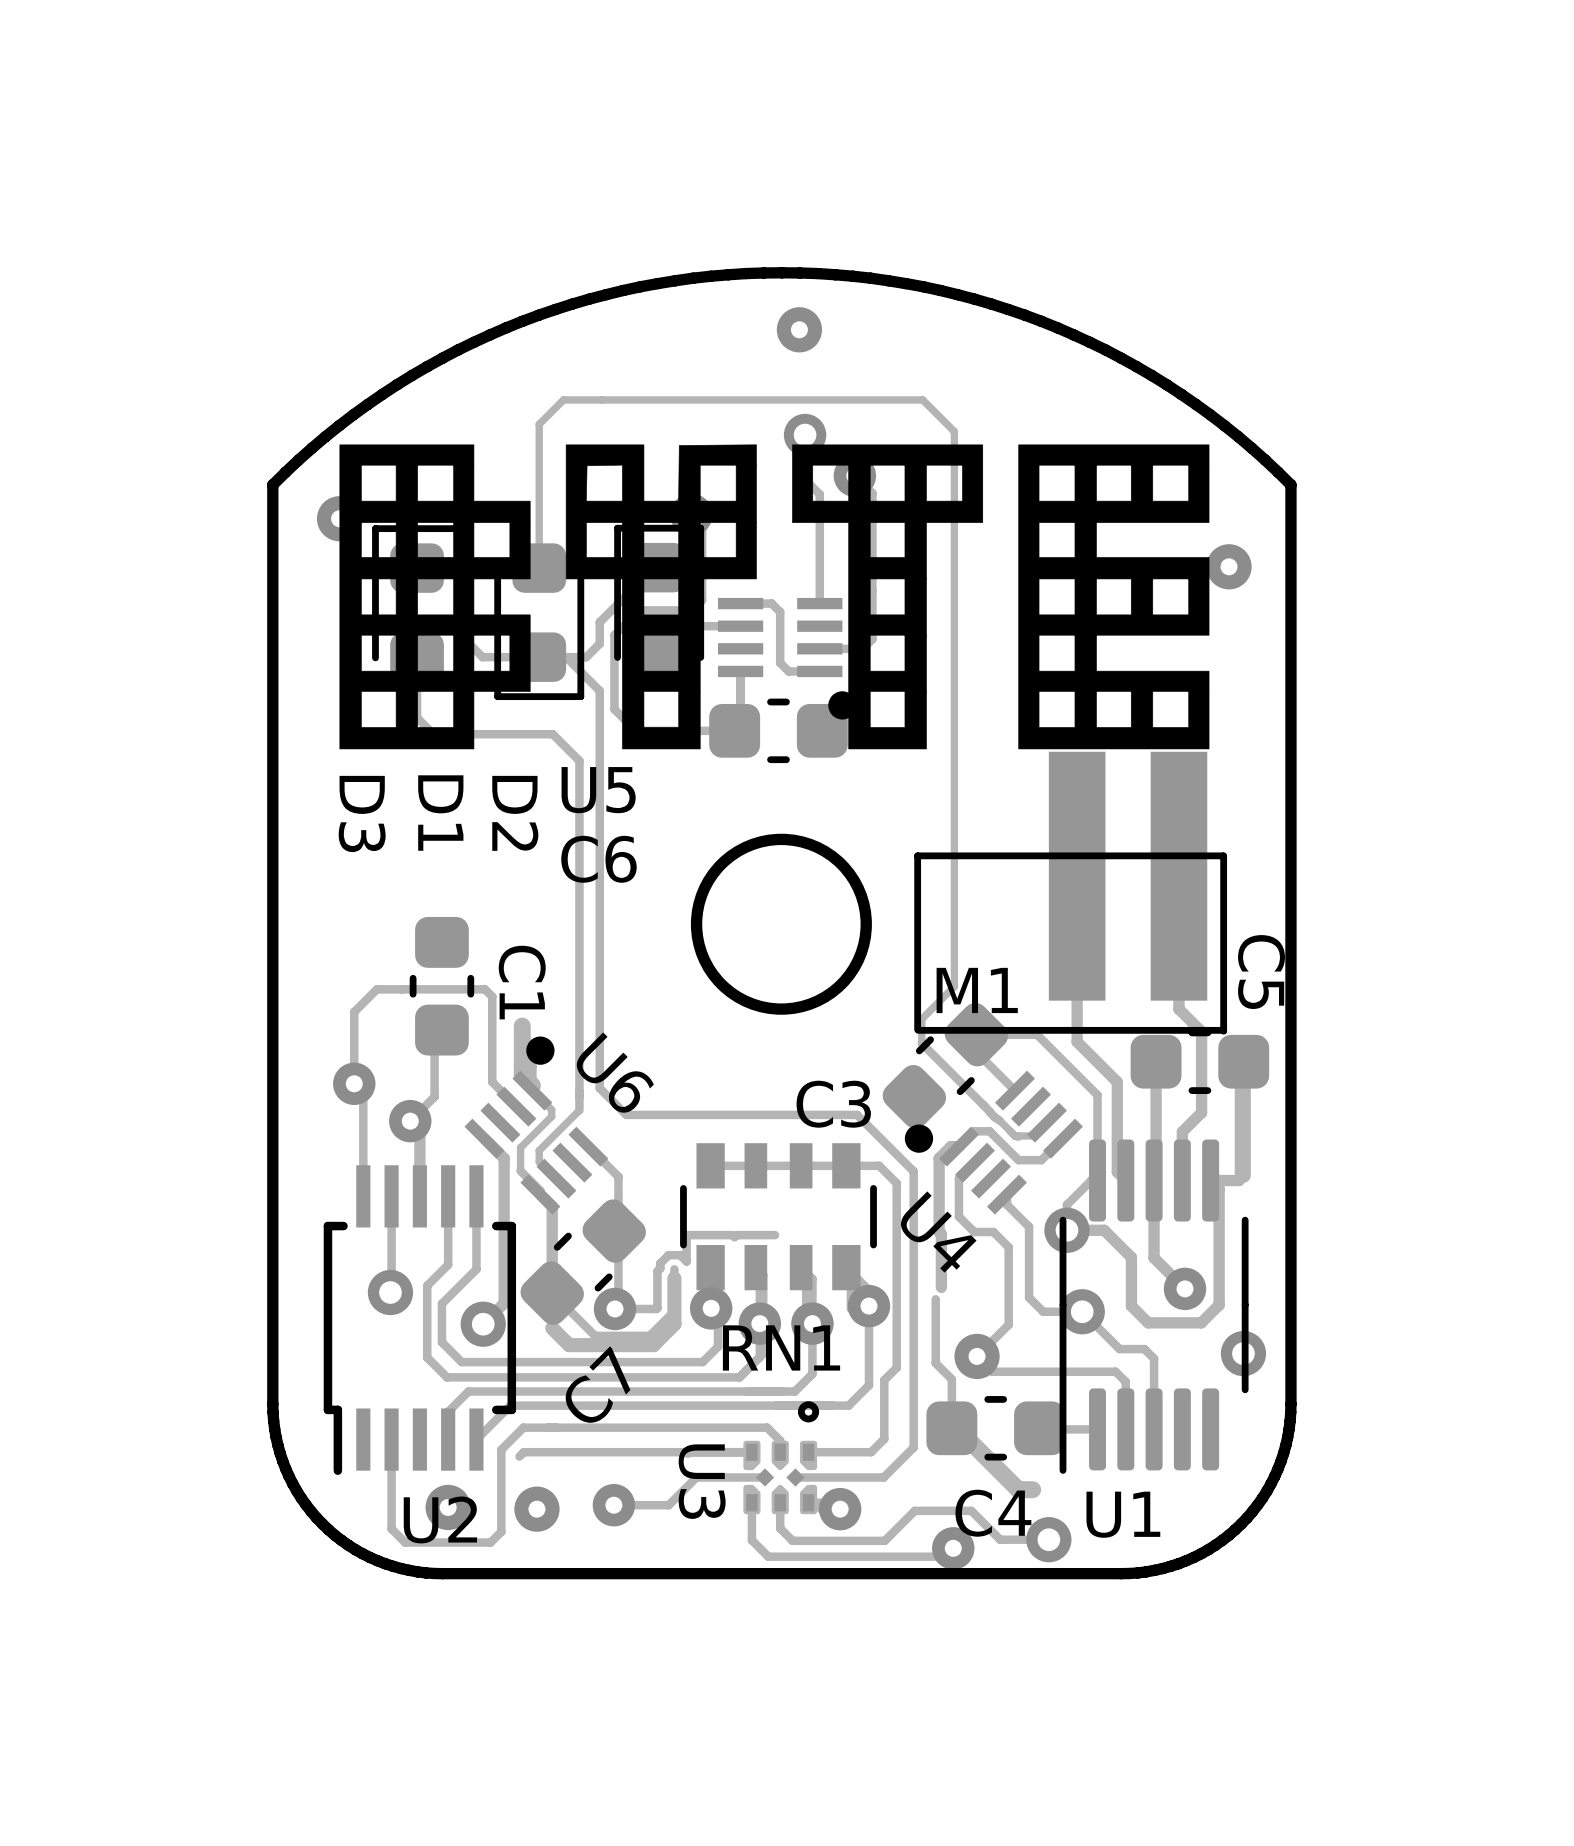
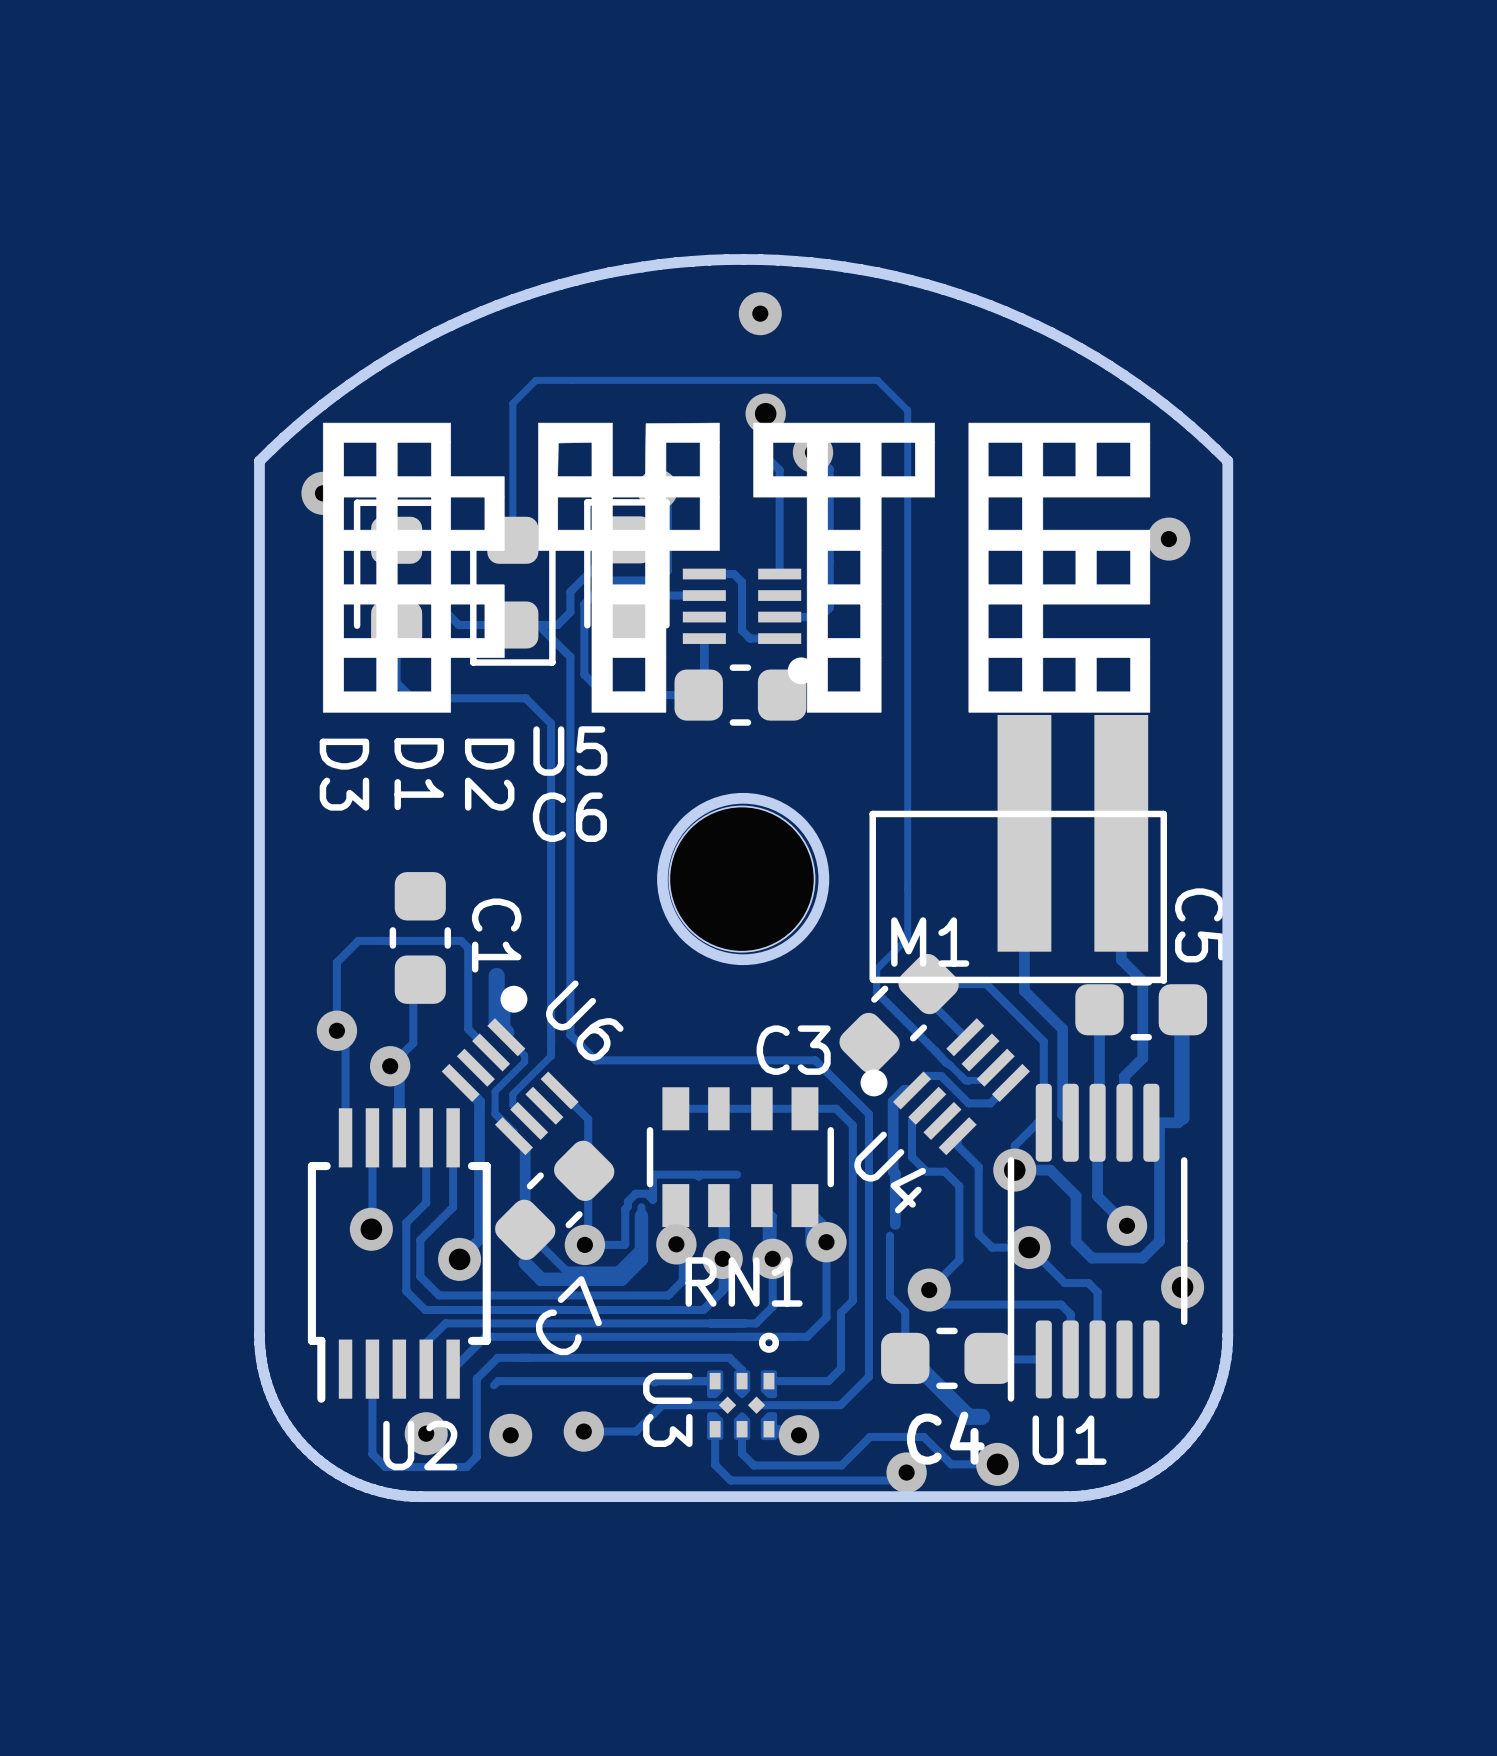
part: none -> (741, 879)

